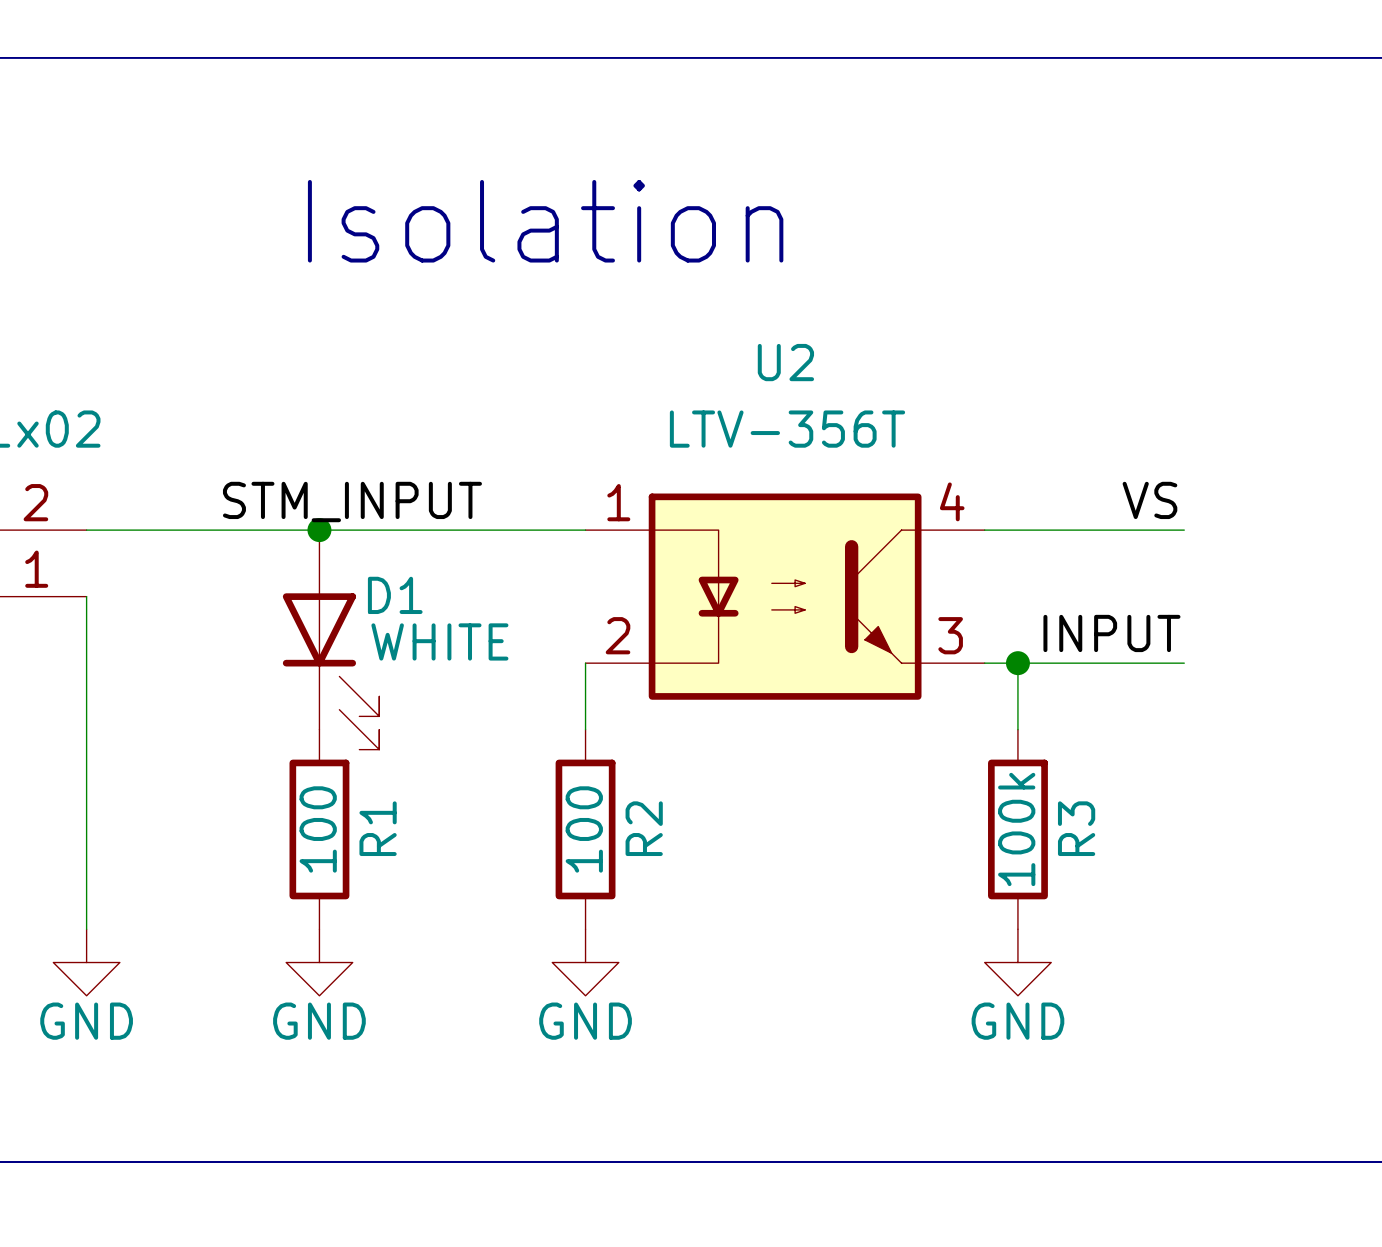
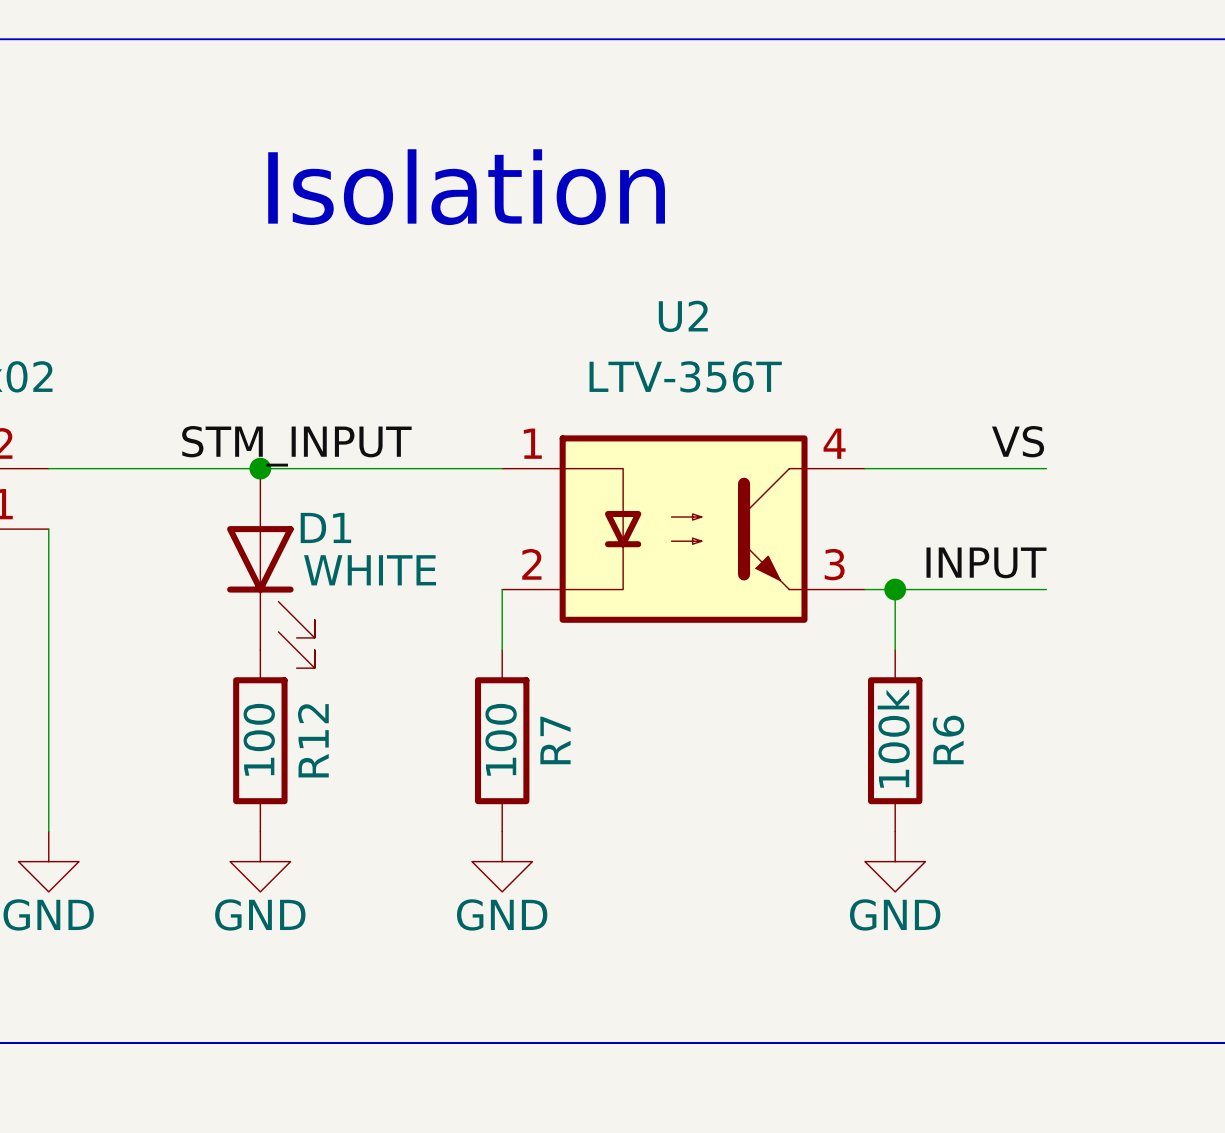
R1 name: R1 (378, 828) -> R12 (313, 740)
R2 name: R2 (644, 828) -> R7 (555, 740)
R3 name: R3 (1076, 828) -> R6 (948, 739)

